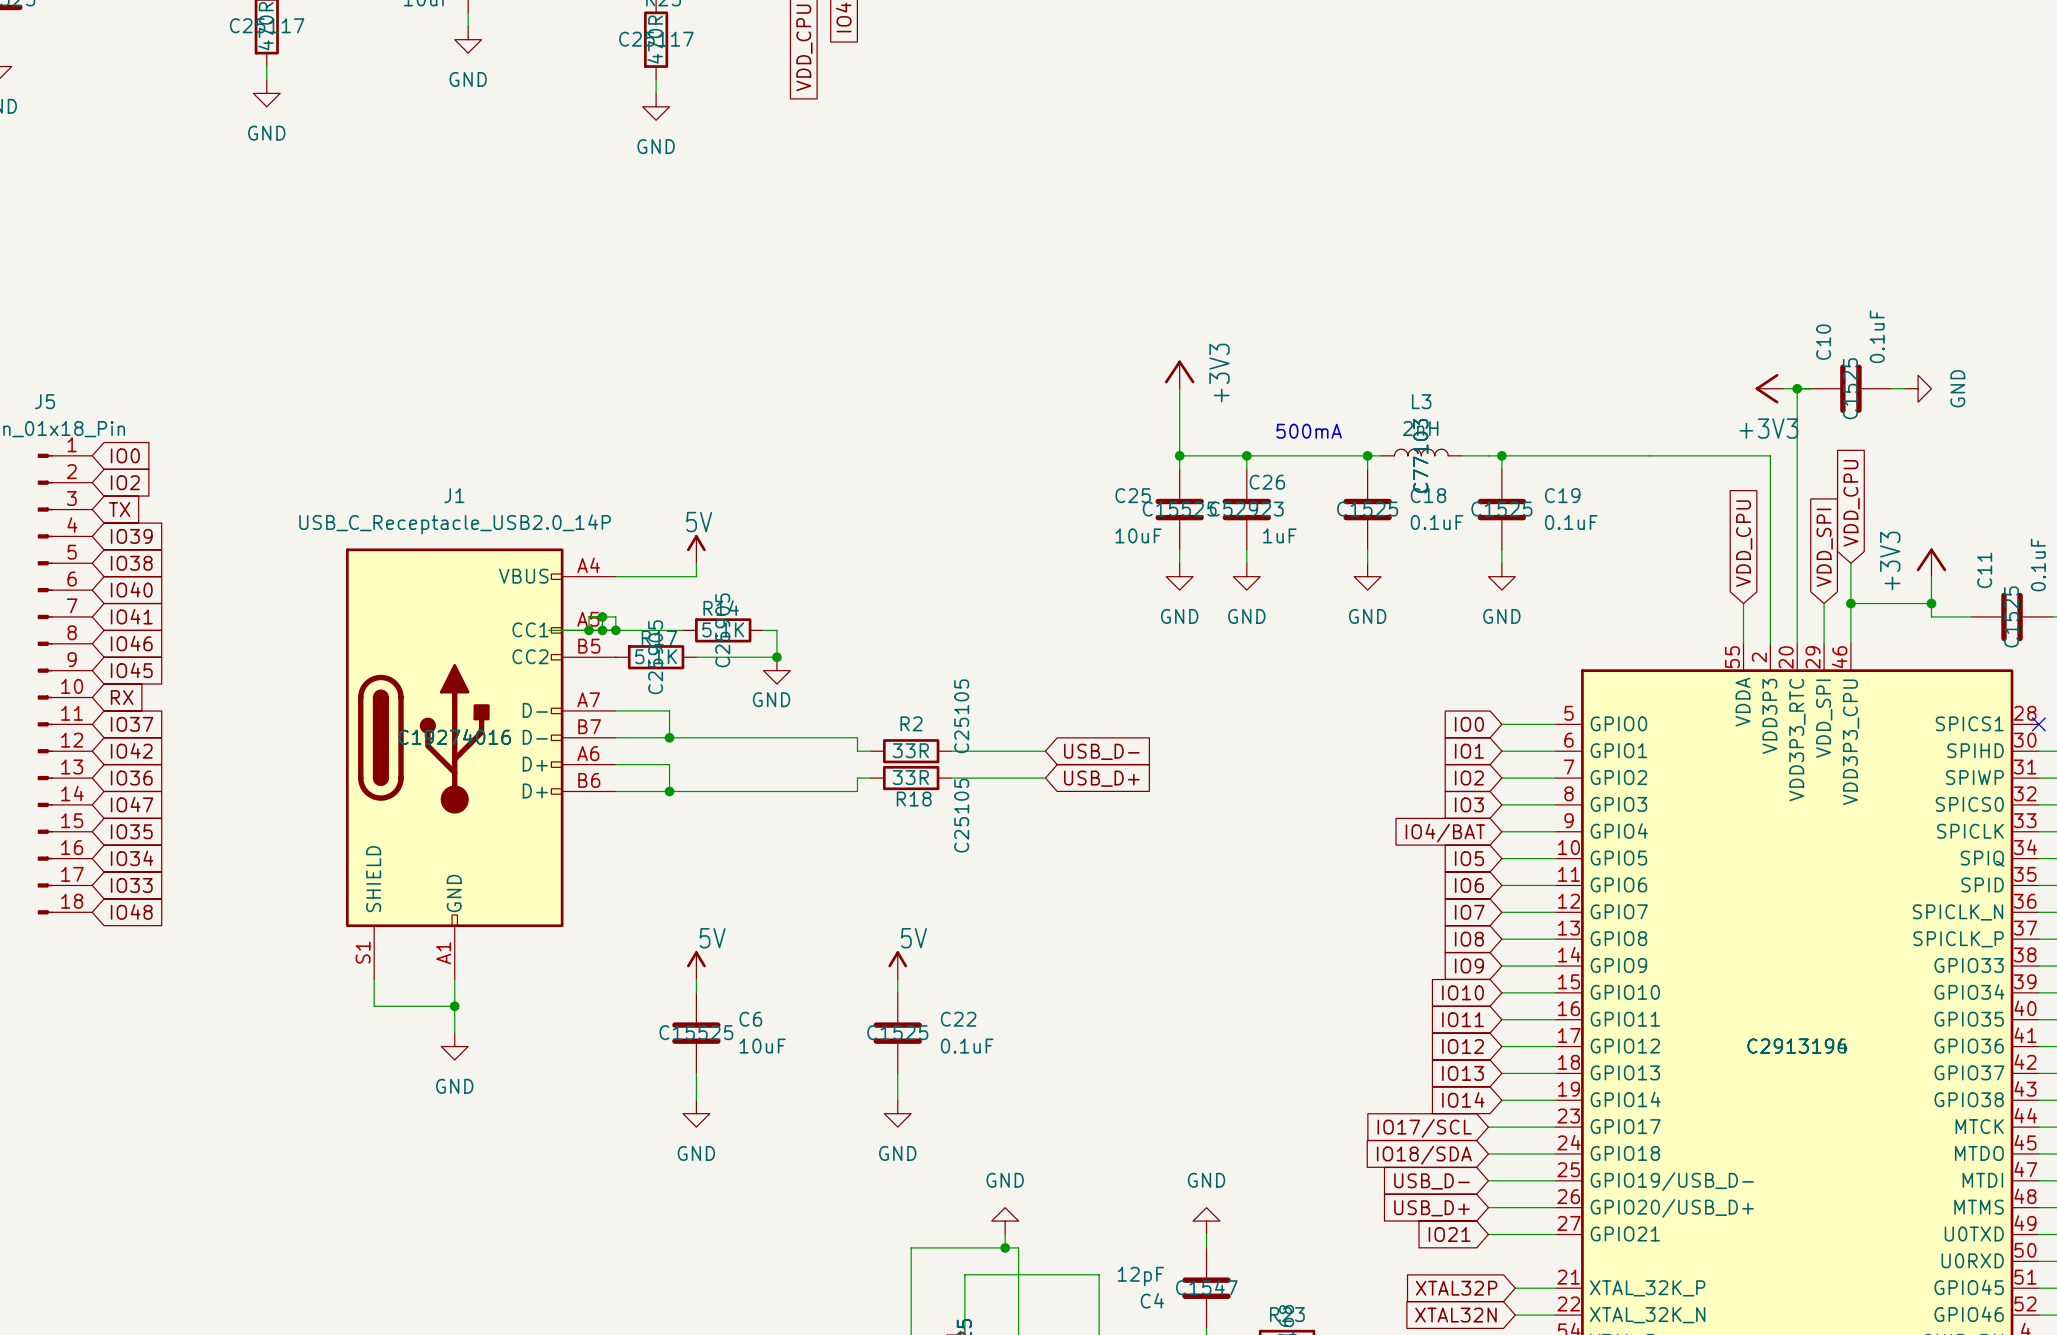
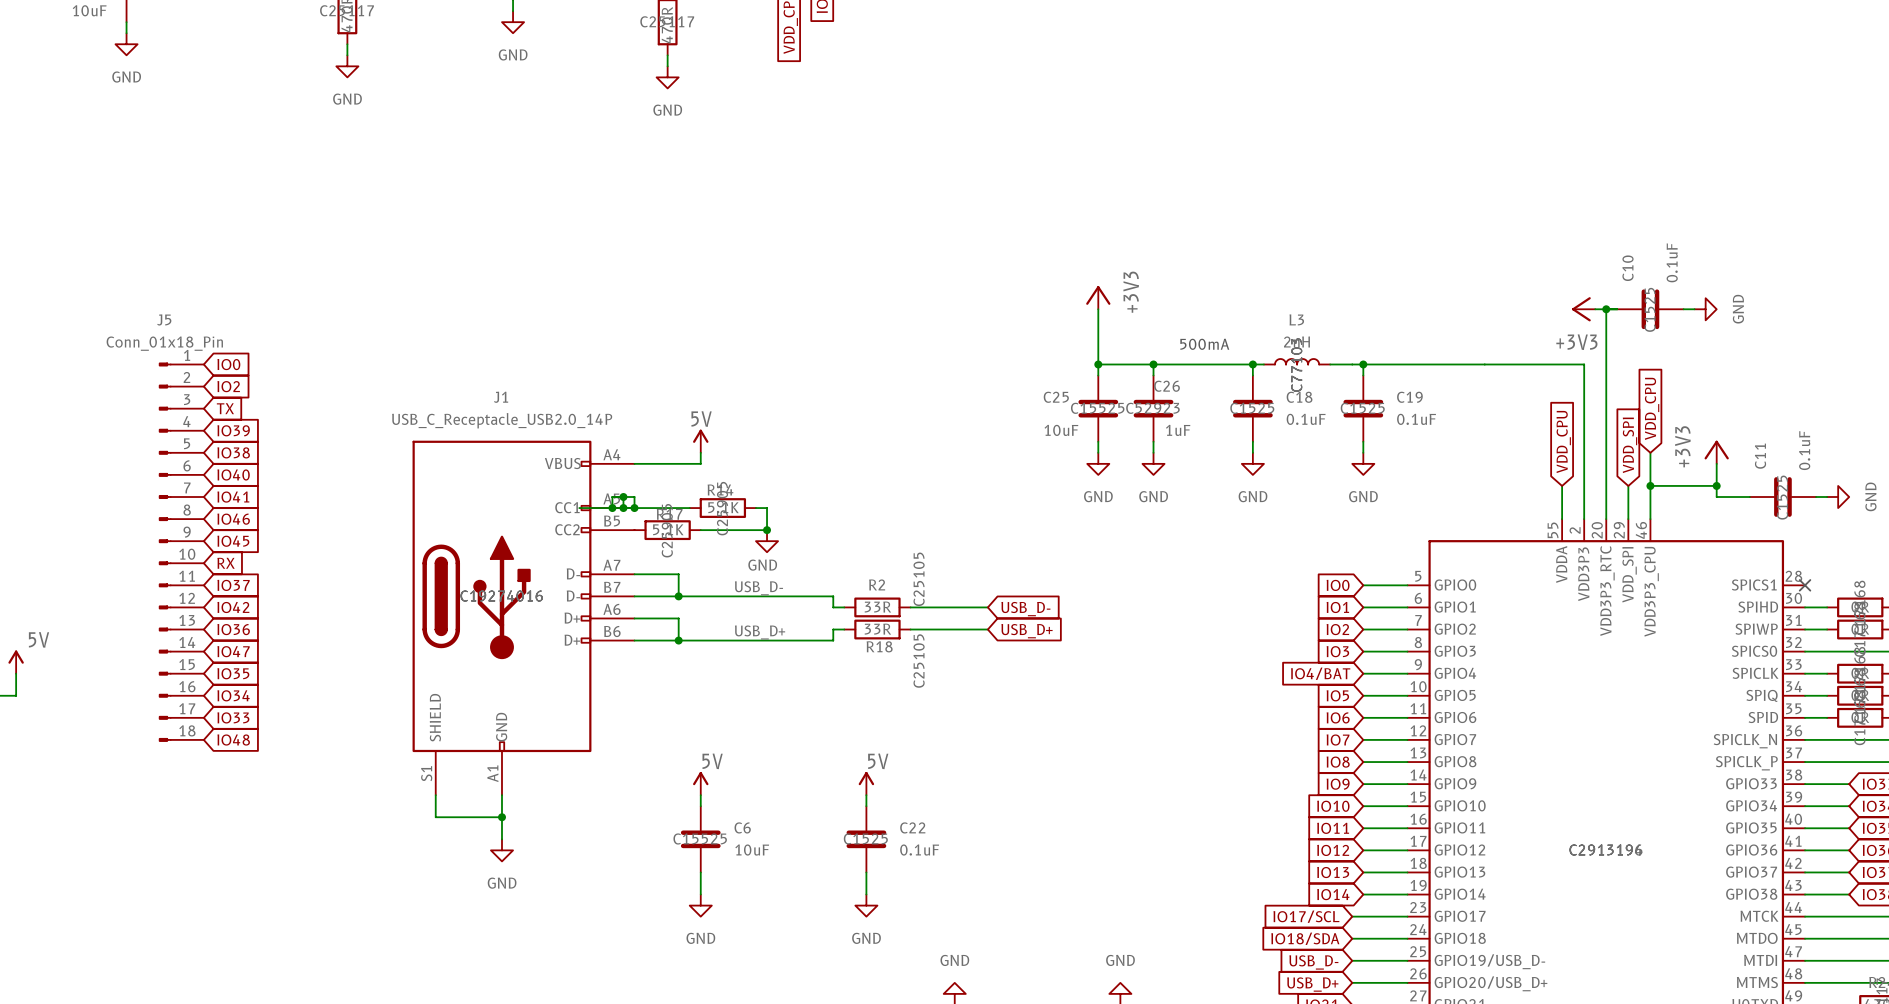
label: none -> USB_D- (758, 588)
label: none -> USB_D+ (760, 632)

